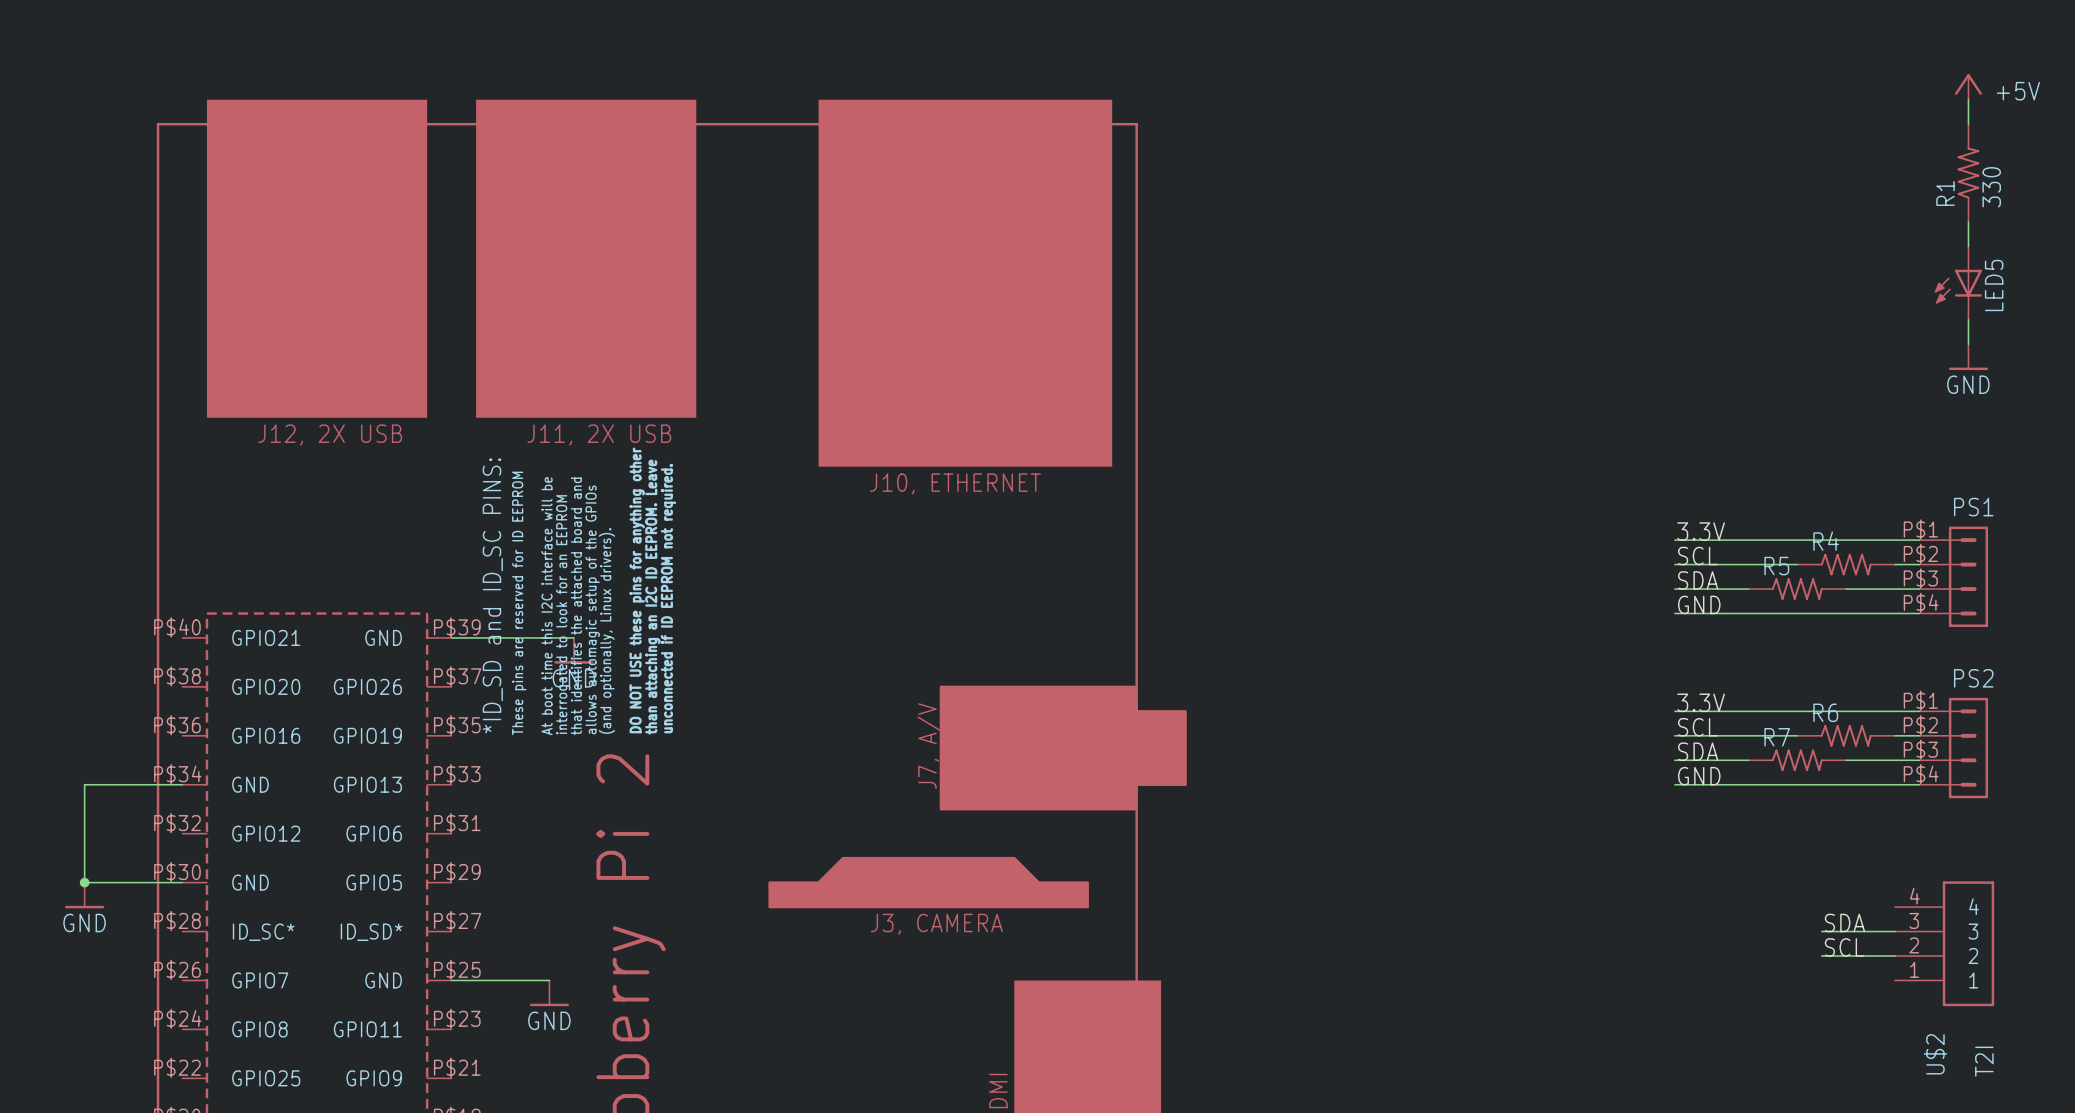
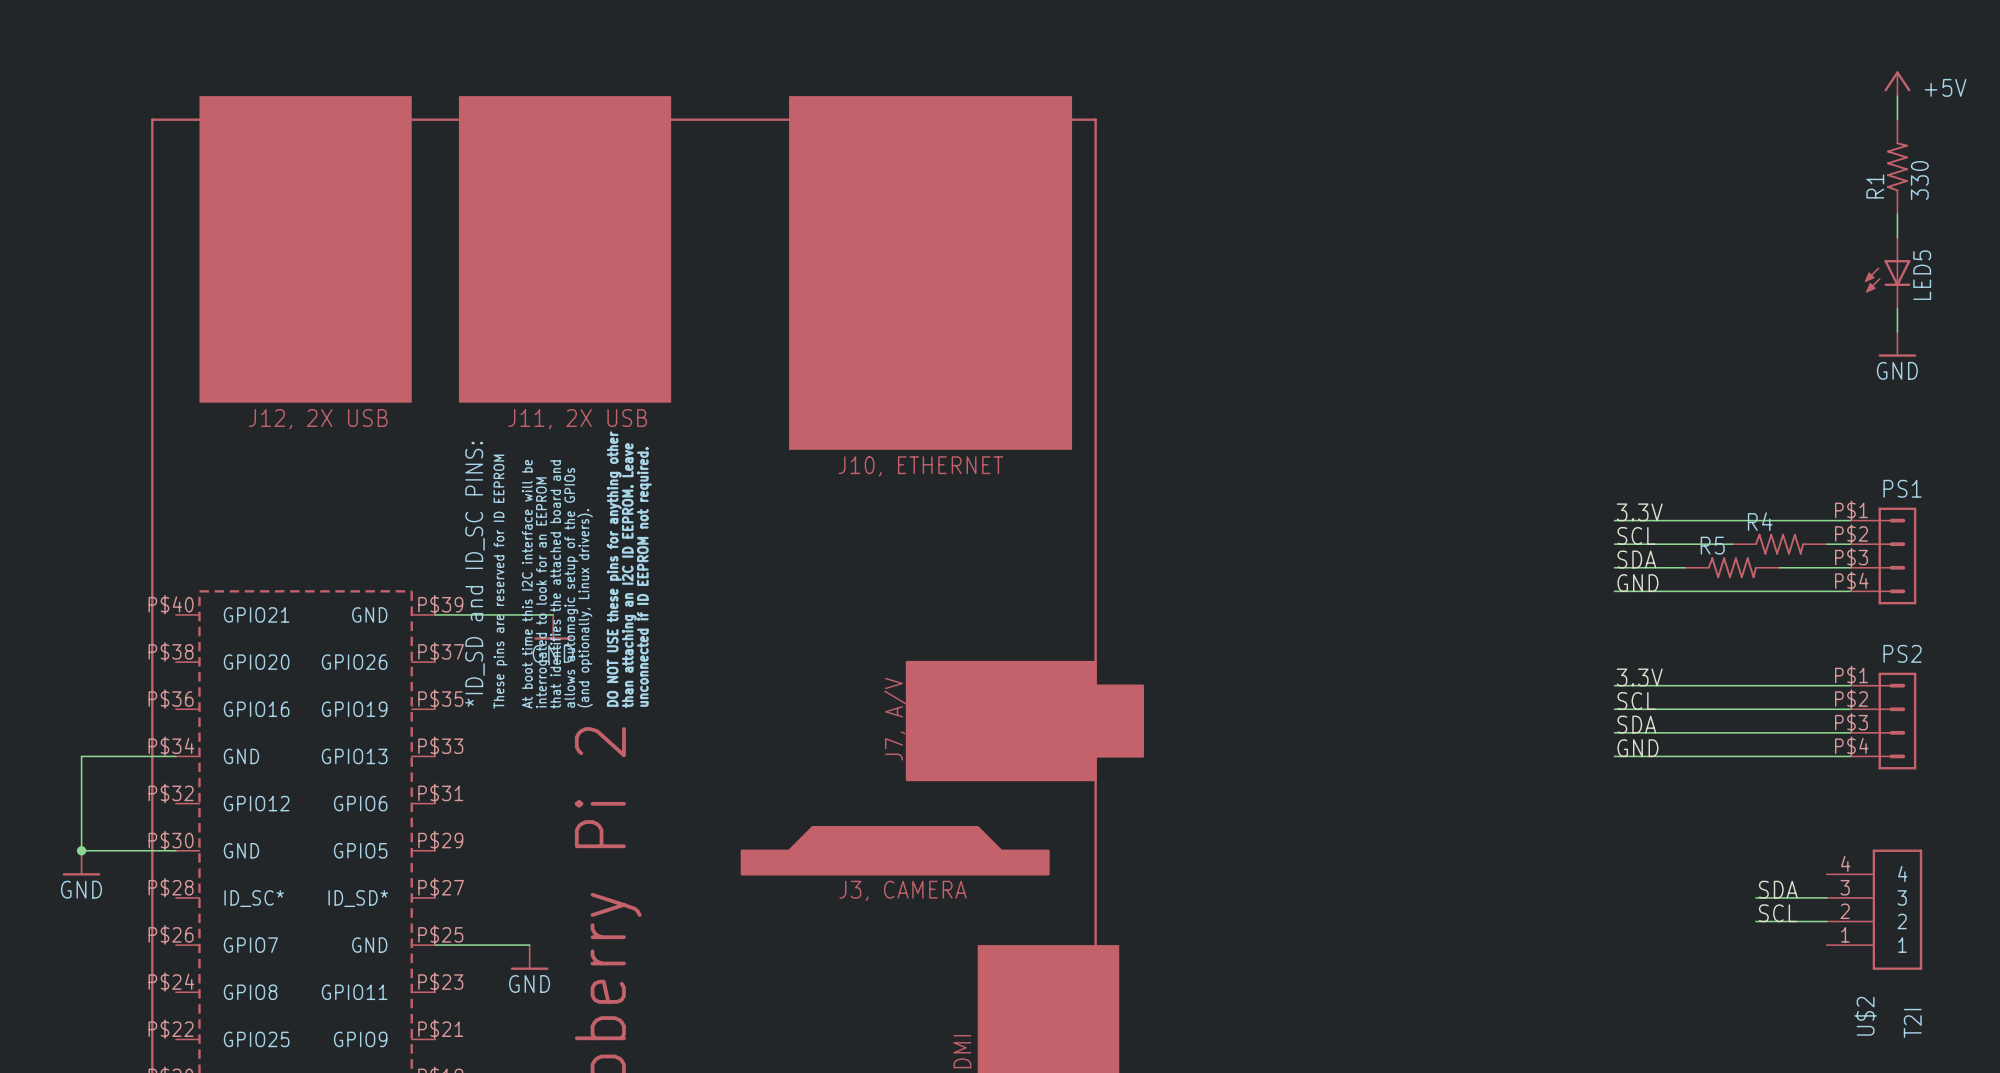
R6: (1846, 735) -> none
R7: (1797, 760) -> none

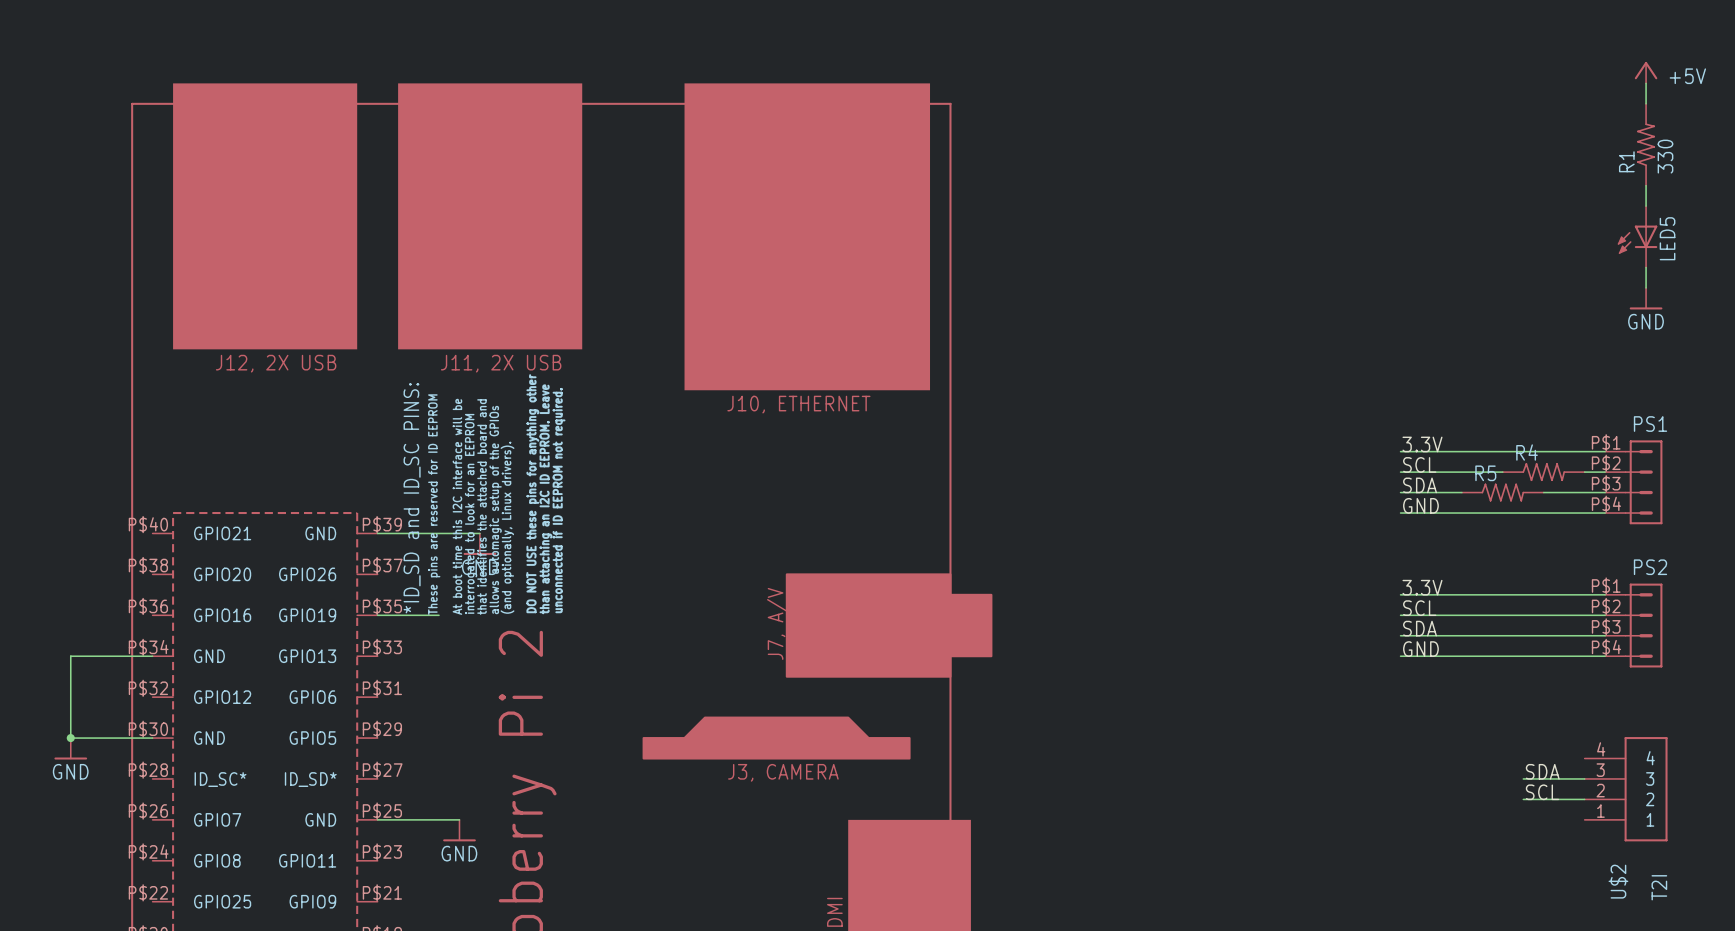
wire: none -> (377, 615) (439, 615)

